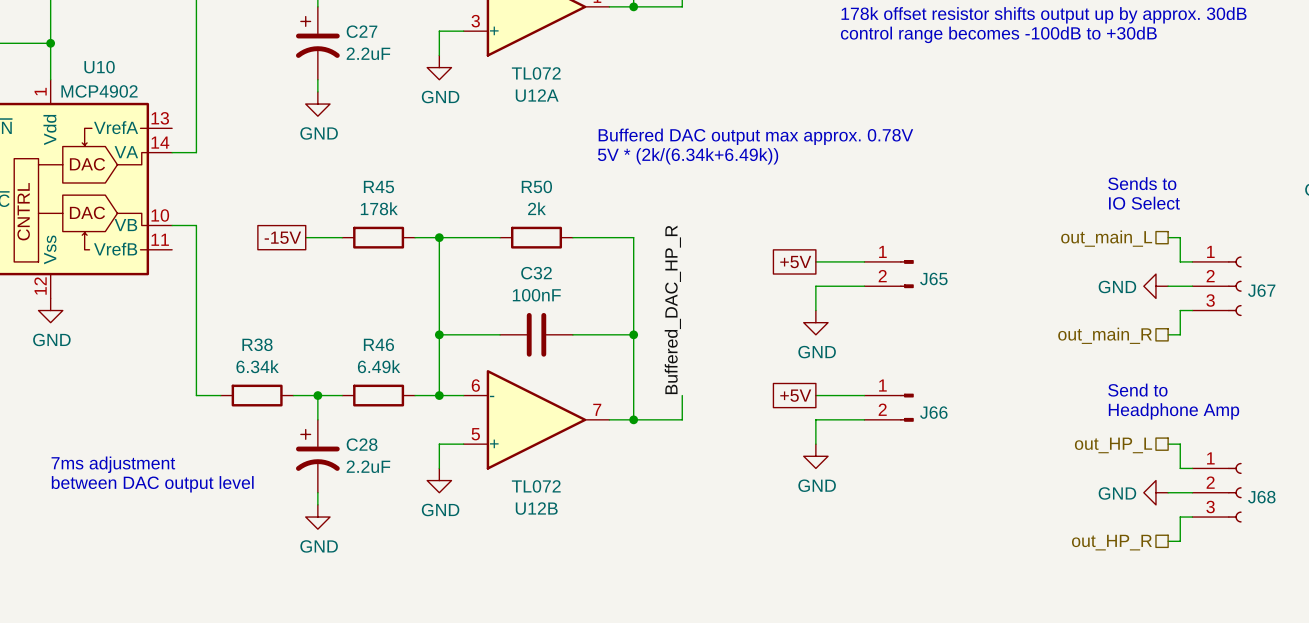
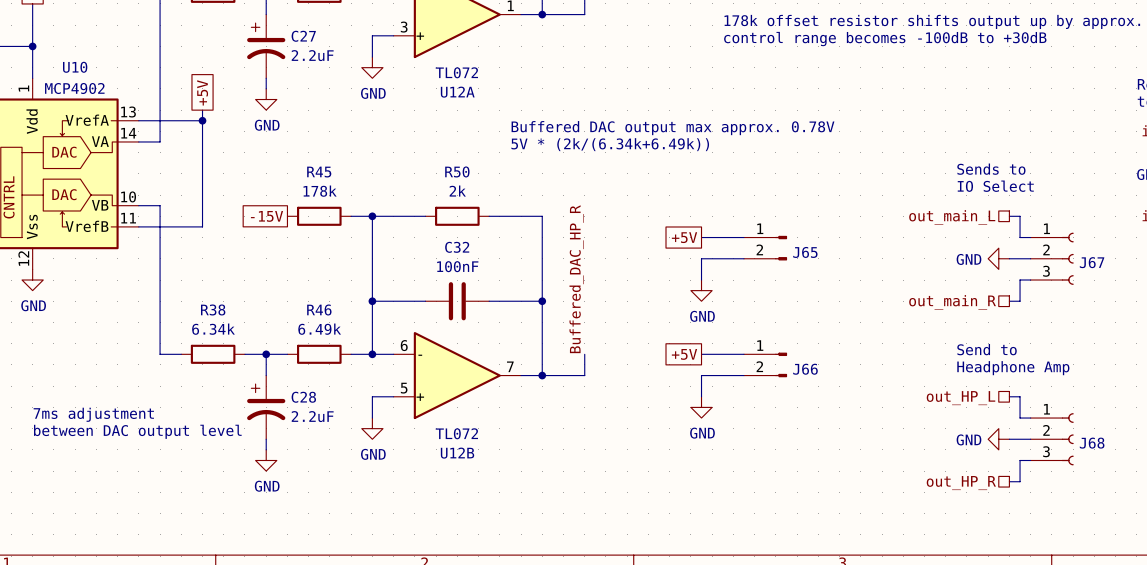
global label: none -> +5V (202, 92)
wire: none -> (202, 110) (202, 226) (138, 226)
wire: none -> (138, 120) (202, 120)
junction: none -> (202, 120)
global label position: -15V (282, 237) -> -15V (267, 216)
wire: (305, 237) (342, 237) -> none

